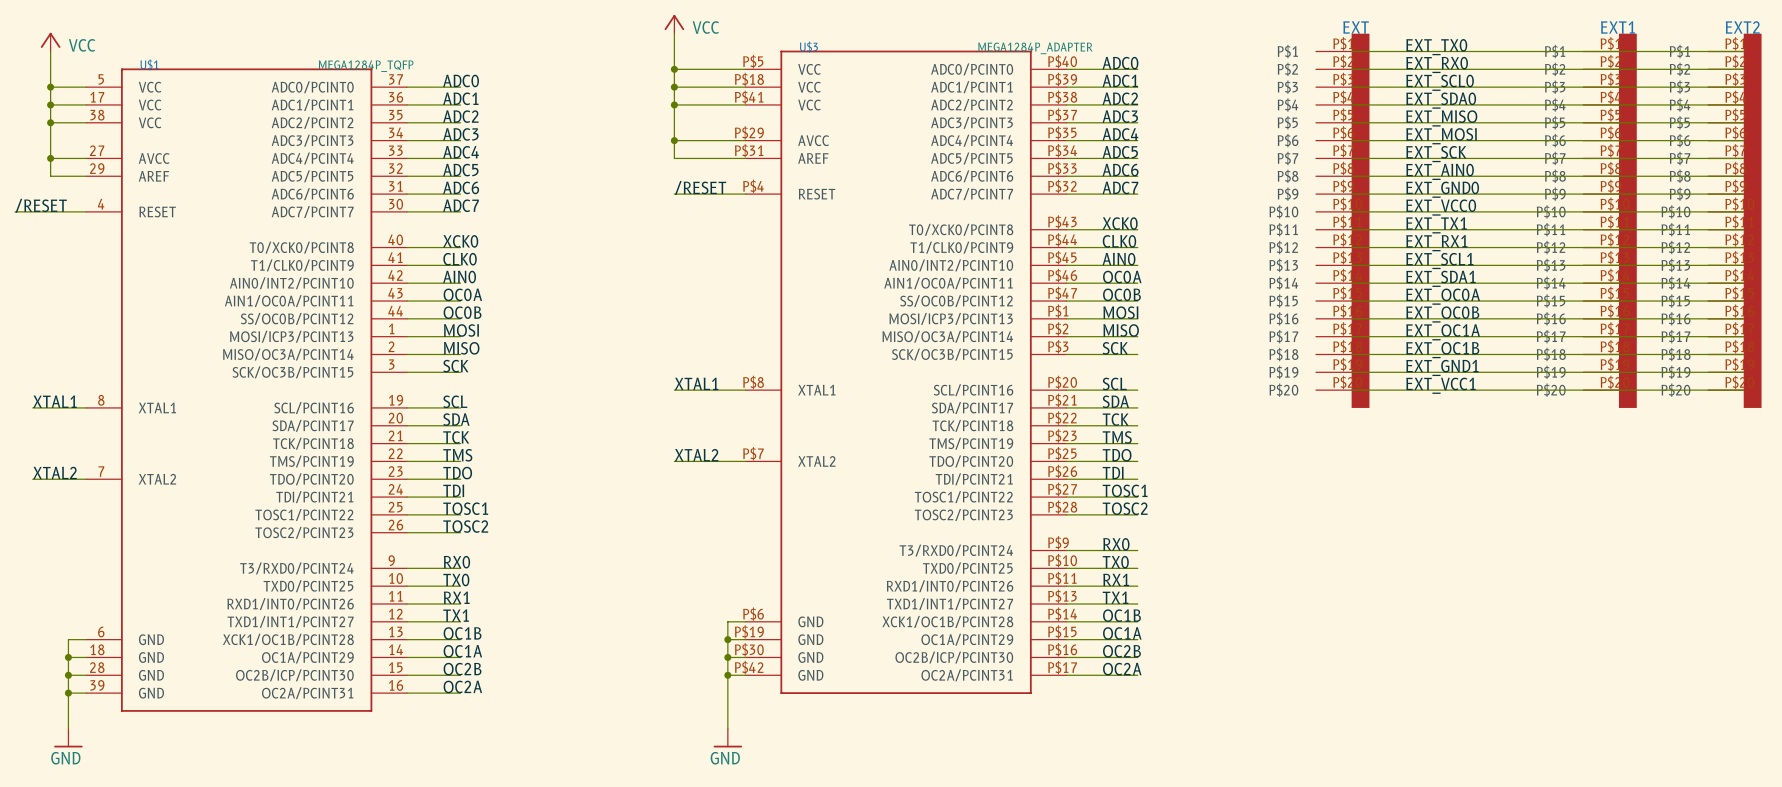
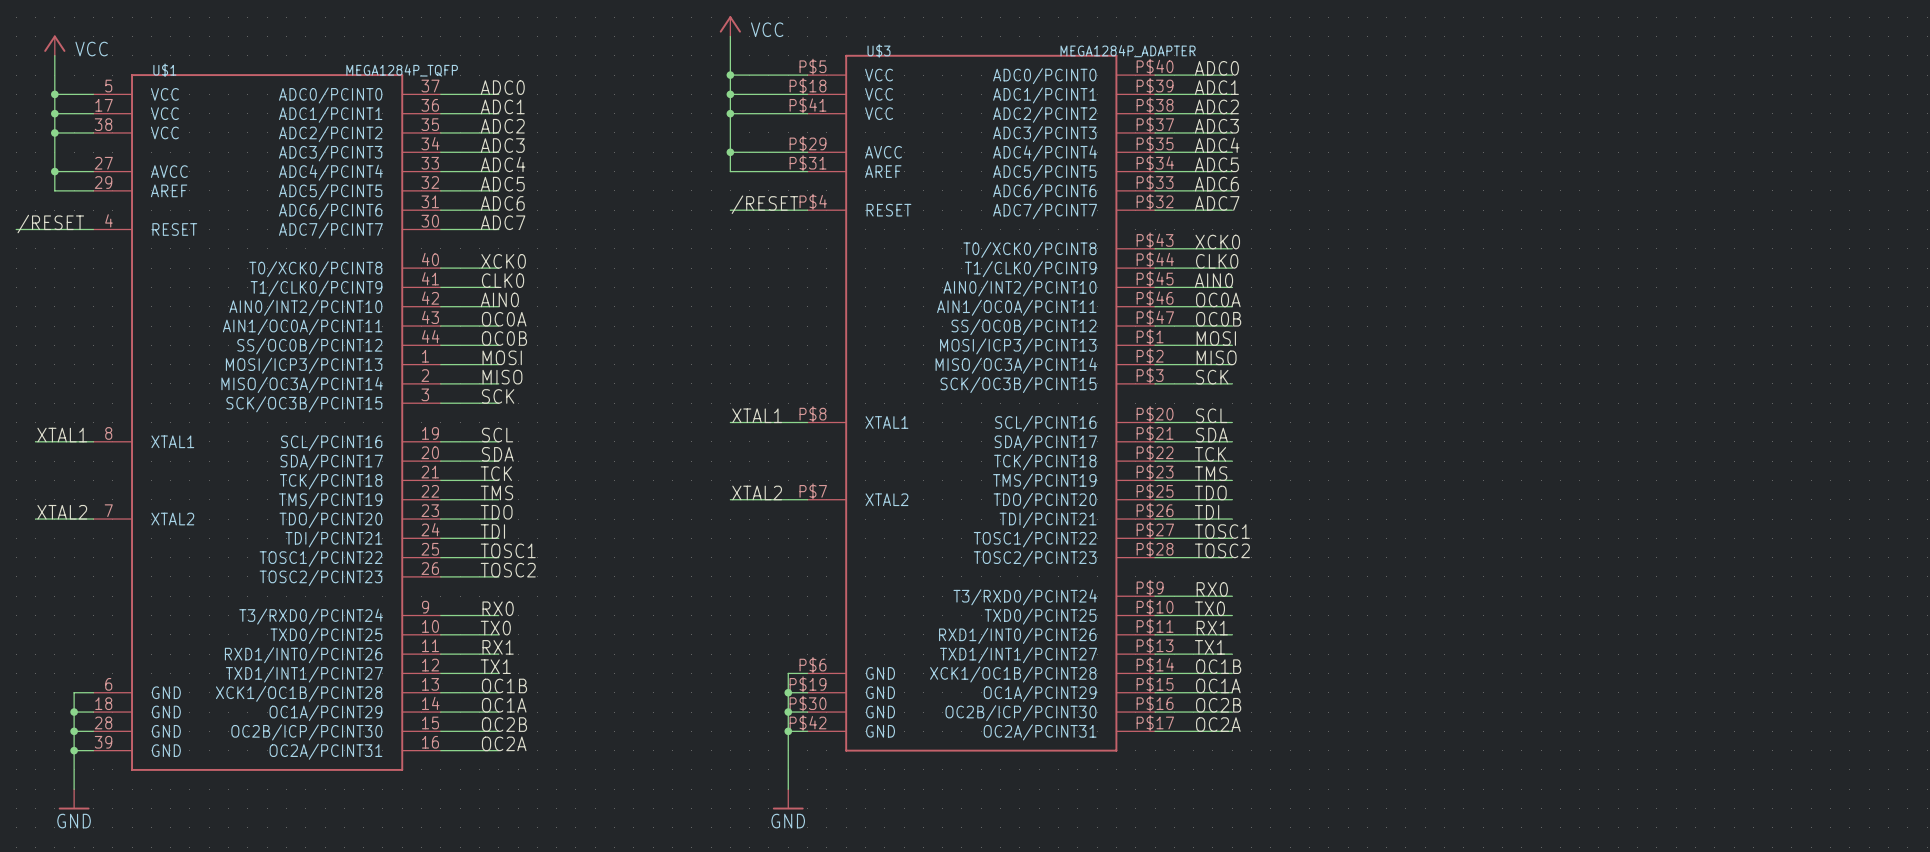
label: EXT_TX0 (1436, 47) -> none
wire: (1351, 51) (1743, 51) -> none
label: EXT_RX0 (1437, 64) -> none
wire: (1351, 69) (1743, 69) -> none
label: EXT_SCL0 (1440, 82) -> none
wire: (1351, 87) (1743, 87) -> none
label: EXT_SDA0 (1441, 100) -> none
wire: (1351, 104) (1743, 104) -> none
label: EXT_MISO (1441, 118) -> none
wire: (1351, 122) (1743, 122) -> none
label: EXT_MOSI (1441, 136) -> none
wire: (1351, 140) (1743, 140) -> none
label: EXT_SCK (1436, 154) -> none
wire: (1351, 158) (1743, 158) -> none
label: EXT_AIN0 (1440, 171) -> none
wire: (1351, 176) (1743, 176) -> none
label: EXT_GND0 (1442, 189) -> none
wire: (1351, 194) (1743, 194) -> none
label: EXT_VCC0 (1441, 207) -> none
wire: (1351, 211) (1743, 211) -> none
EXT: (1342, 220) -> none
EXT1: (1610, 220) -> none
EXT2: (1734, 220) -> none
label: EXT_TX1 (1436, 225) -> none
wire: (1351, 229) (1743, 229) -> none
label: EXT_RX1 (1436, 243) -> none
wire: (1351, 247) (1743, 247) -> none
label: EXT_SCL1 (1439, 261) -> none
wire: (1351, 265) (1743, 265) -> none
label: EXT_SDA1 (1440, 278) -> none
wire: (1351, 283) (1743, 283) -> none
label: EXT_OC0A (1443, 296) -> none
wire: (1351, 301) (1743, 301) -> none
label: EXT_OC0B (1442, 314) -> none
wire: (1351, 318) (1743, 318) -> none
label: EXT_OC1A (1443, 332) -> none
wire: (1351, 336) (1743, 336) -> none
label: EXT_OC1B (1442, 350) -> none
wire: (1351, 354) (1743, 354) -> none
label: EXT_GND1 (1442, 367) -> none
wire: (1351, 372) (1743, 372) -> none
label: EXT_VCC1 (1440, 385) -> none
wire: (1351, 390) (1743, 390) -> none

